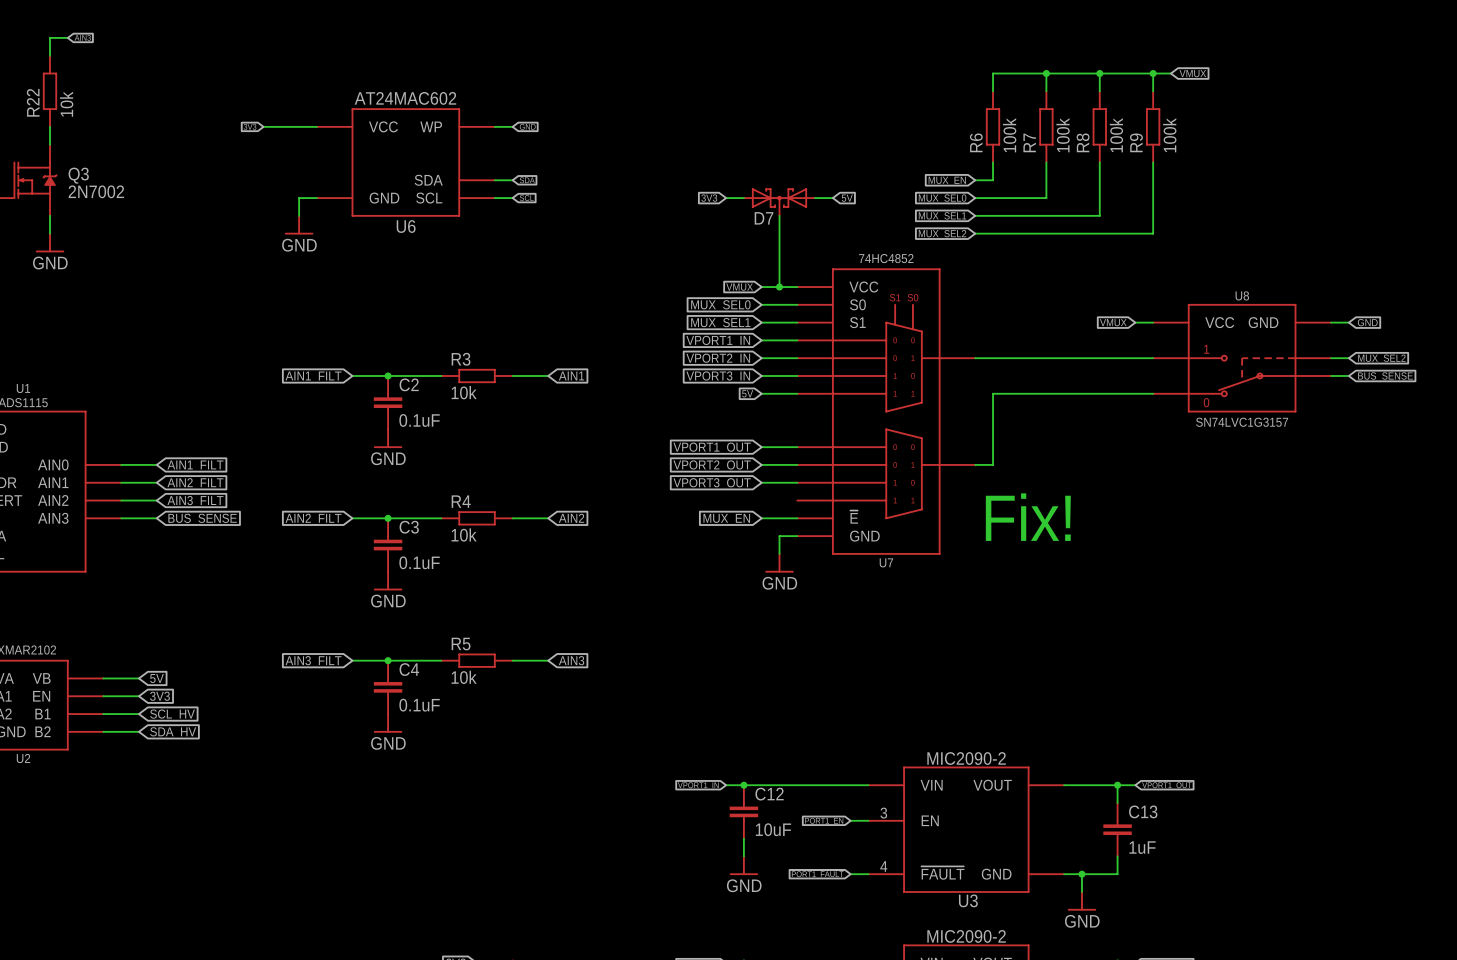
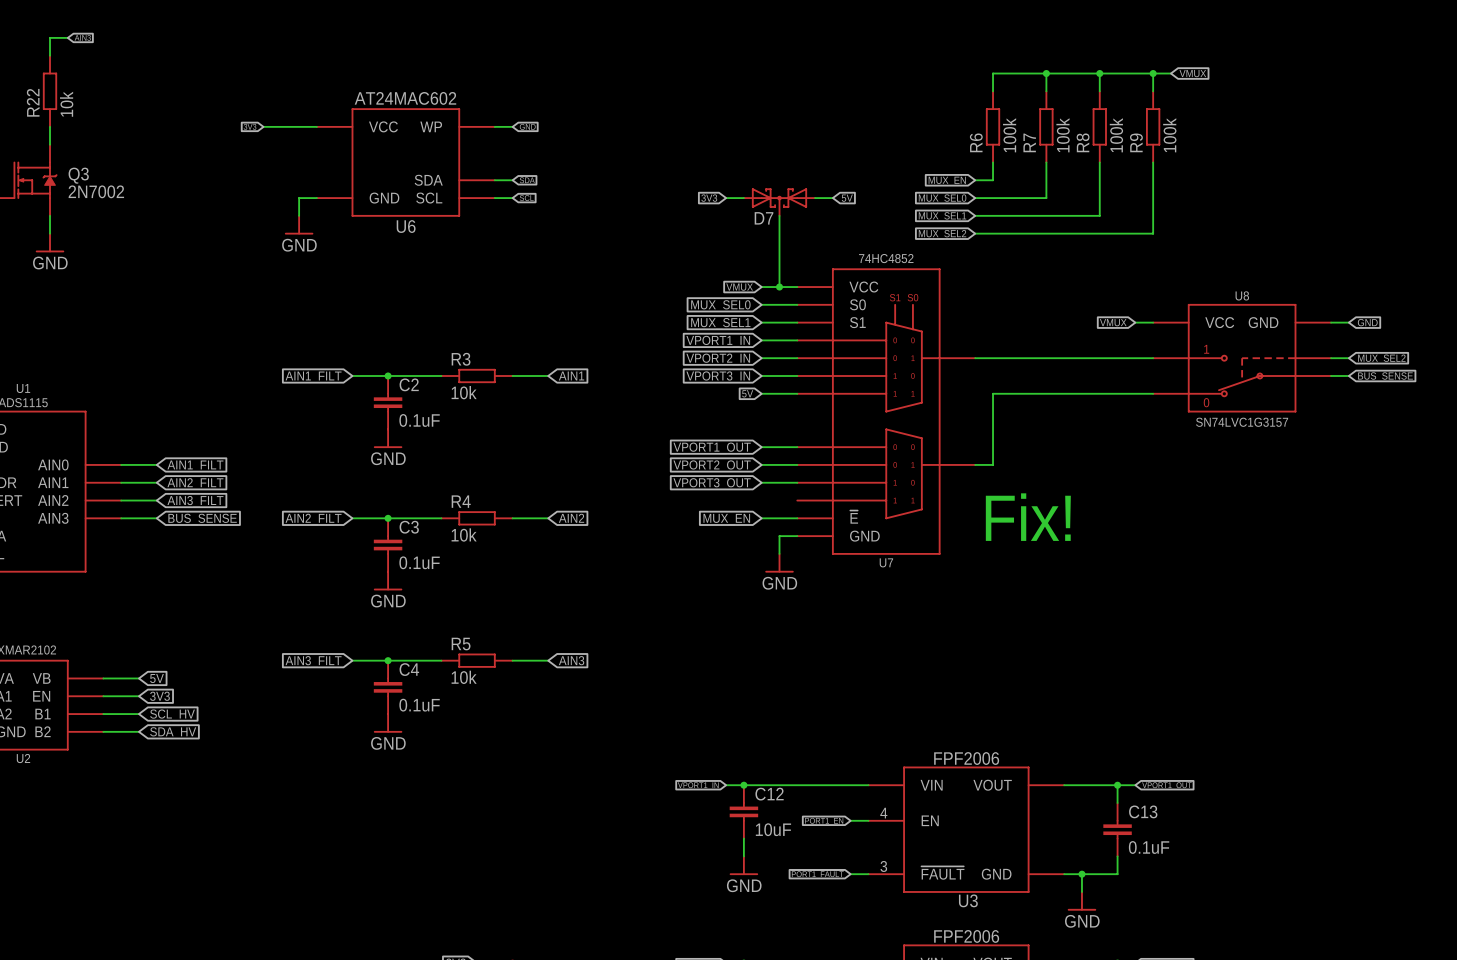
U3 text: MIC2090-2 (966, 758) -> FPF2006 (966, 758)
U3 pin number: 3 (883, 813) -> 4 (883, 813)
C13 value: 1uF (1142, 847) -> 0.1uF (1149, 847)
U3 pin number: 4 (883, 866) -> 3 (883, 866)
part text: MIC2090-2 (966, 936) -> FPF2006 (966, 936)

